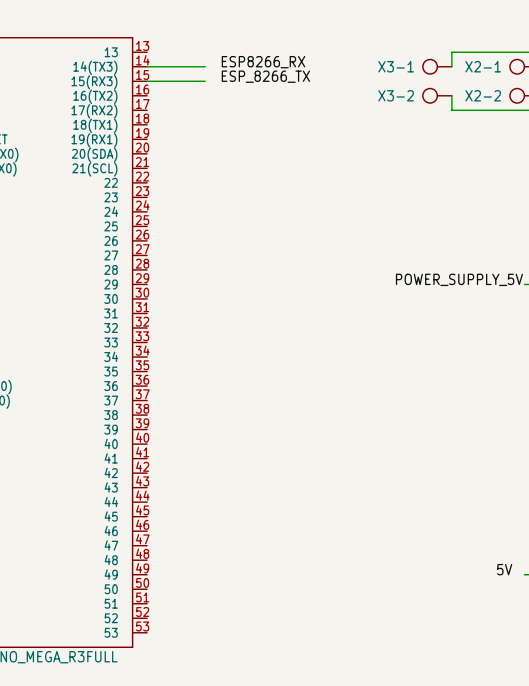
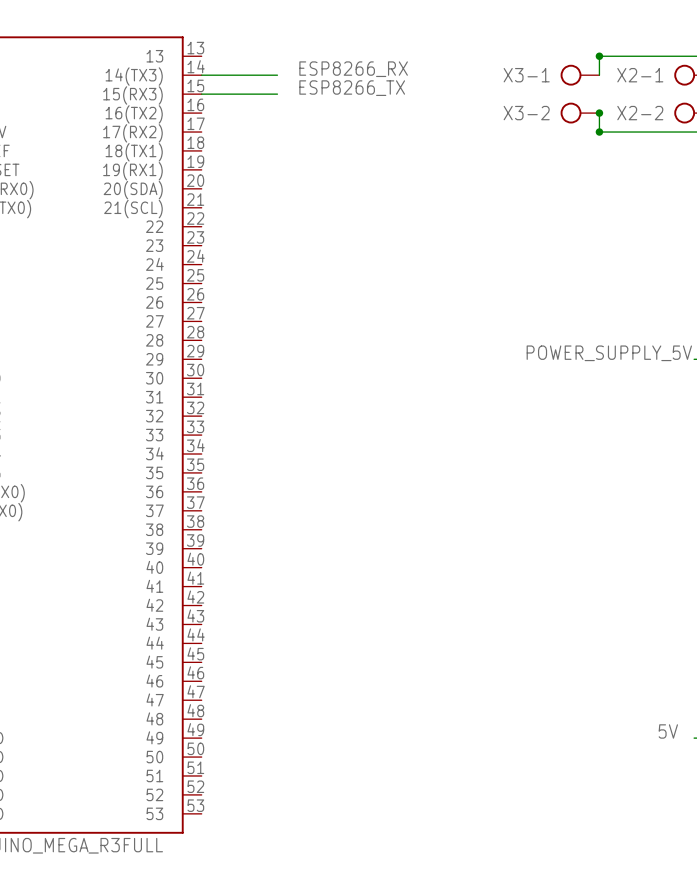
junction: none -> (599, 56)
label: ESP_8266_TX (265, 76) -> ESP8266_TX (352, 88)
junction: none -> (599, 113)
junction: none -> (599, 132)

